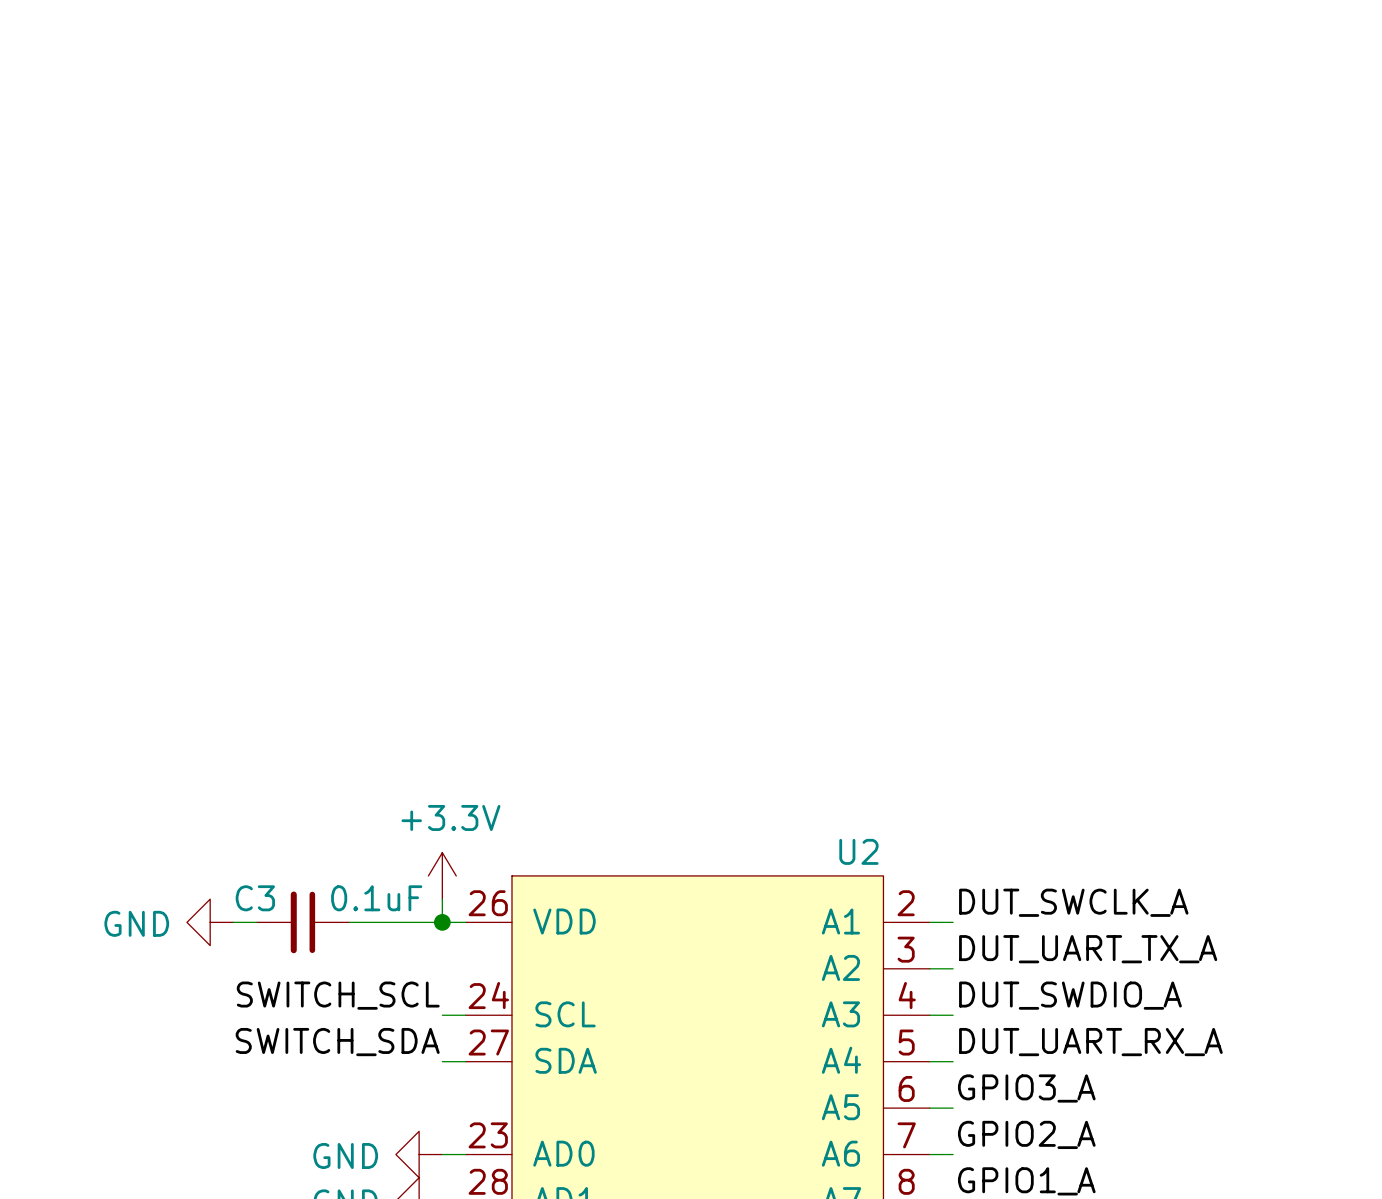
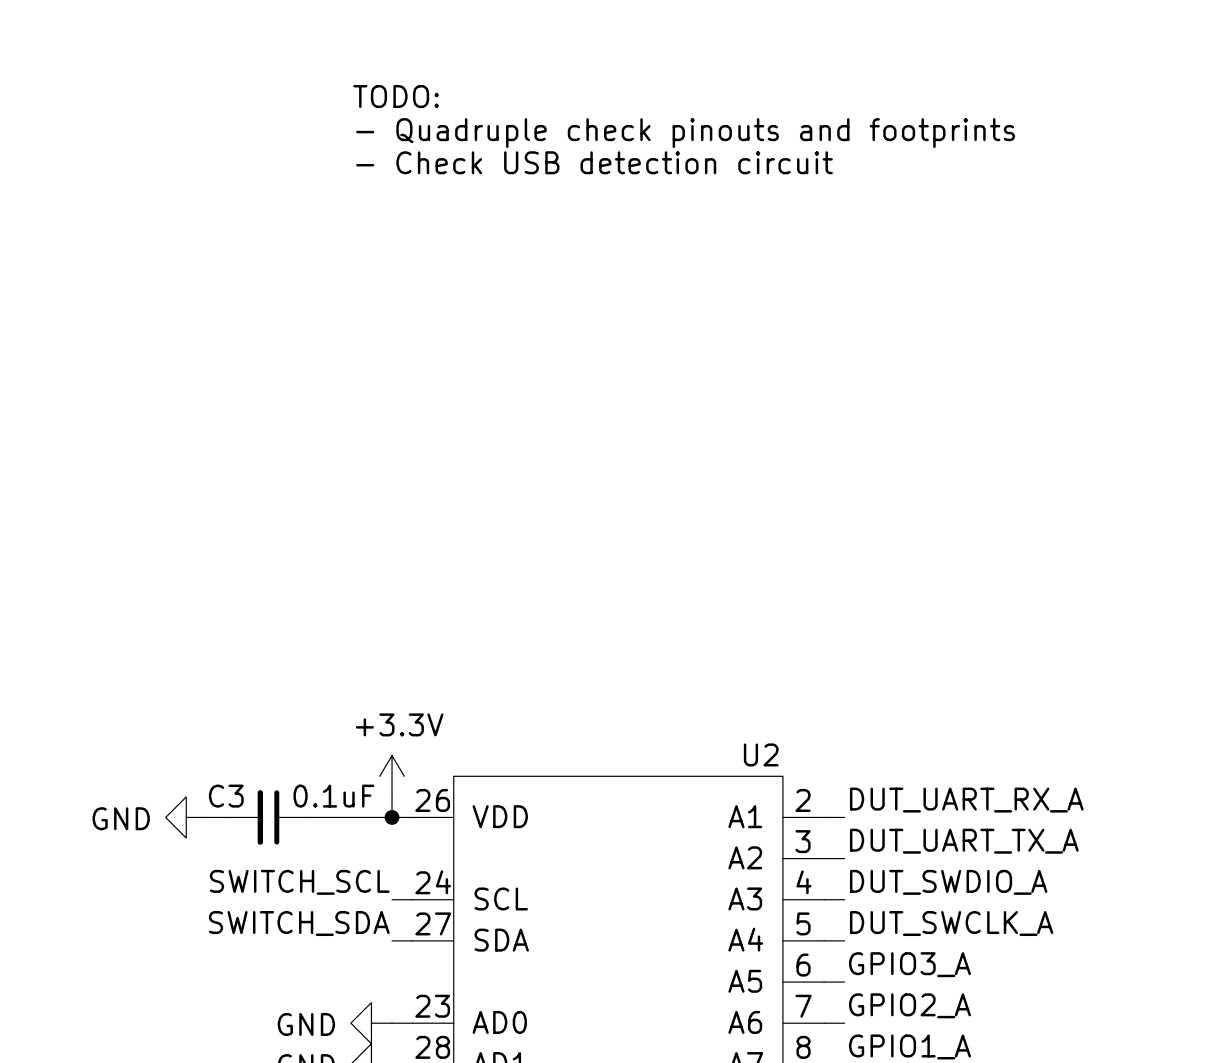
text: none -> TODO: (396, 96)
text: none -> - Quadruple check pinouts and footprints (685, 133)
text: none -> - Check USB detection circuit (594, 162)
label: DUT_SWCLK_A (1073, 902) -> DUT_UART_RX_A (966, 800)
label: DUT_UART_RX_A (1090, 1042) -> DUT_SWCLK_A (951, 923)

